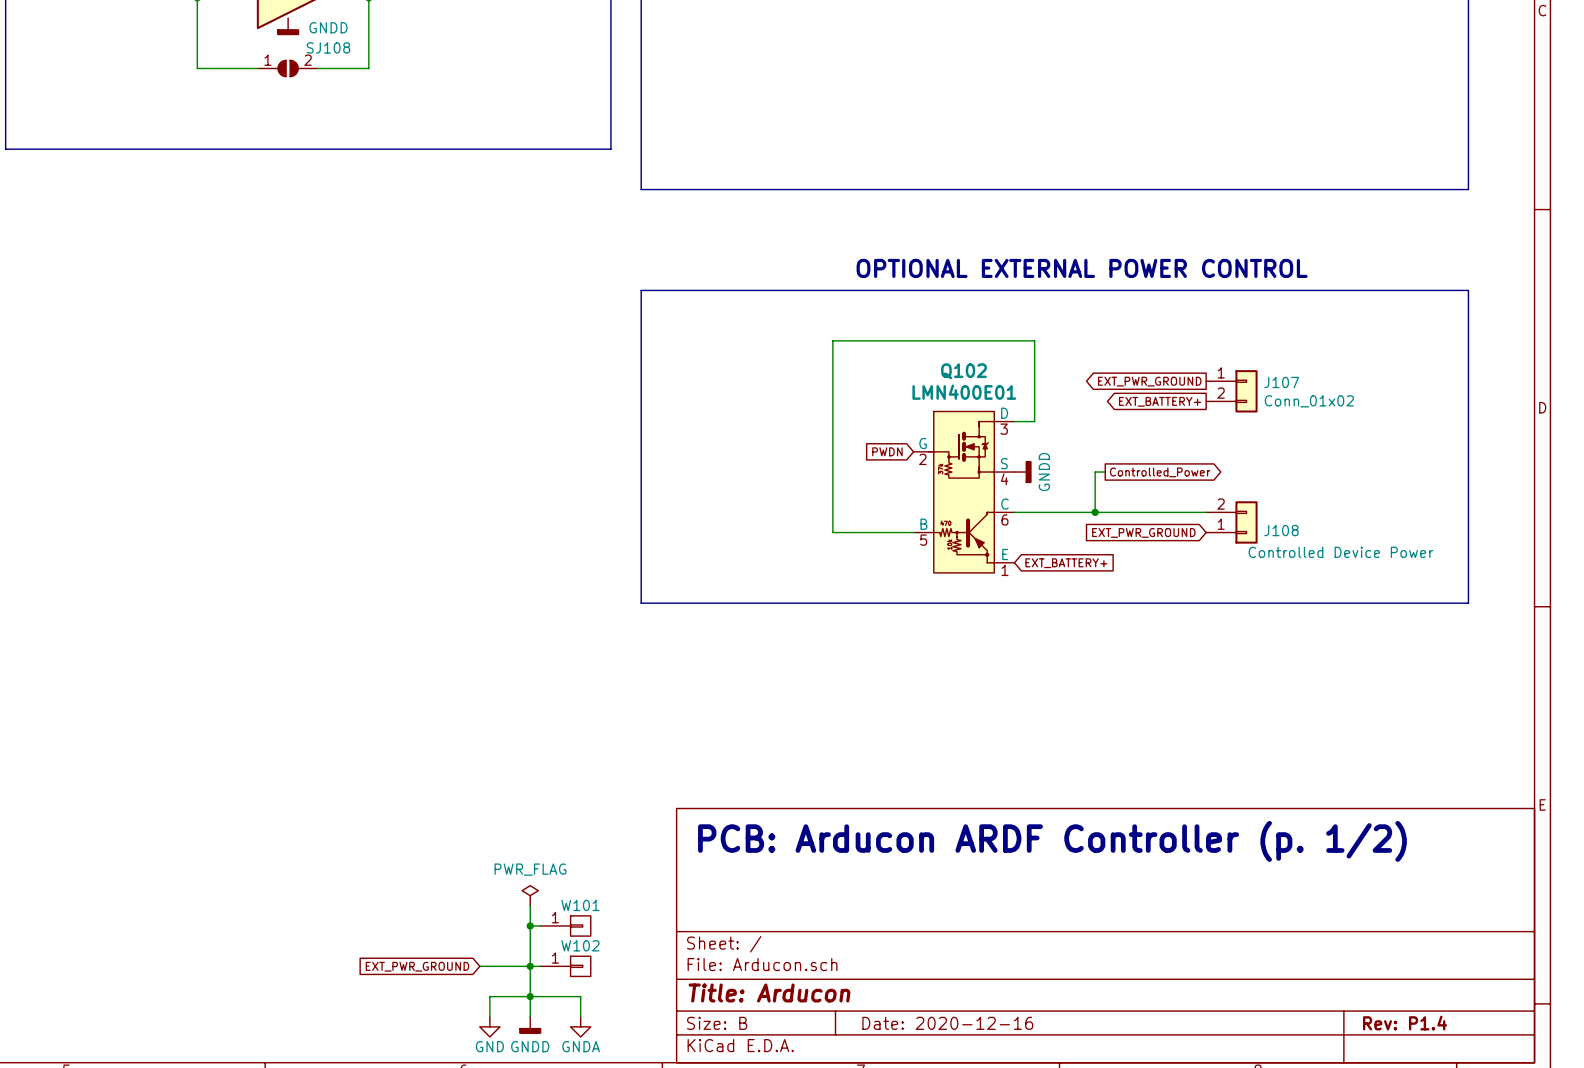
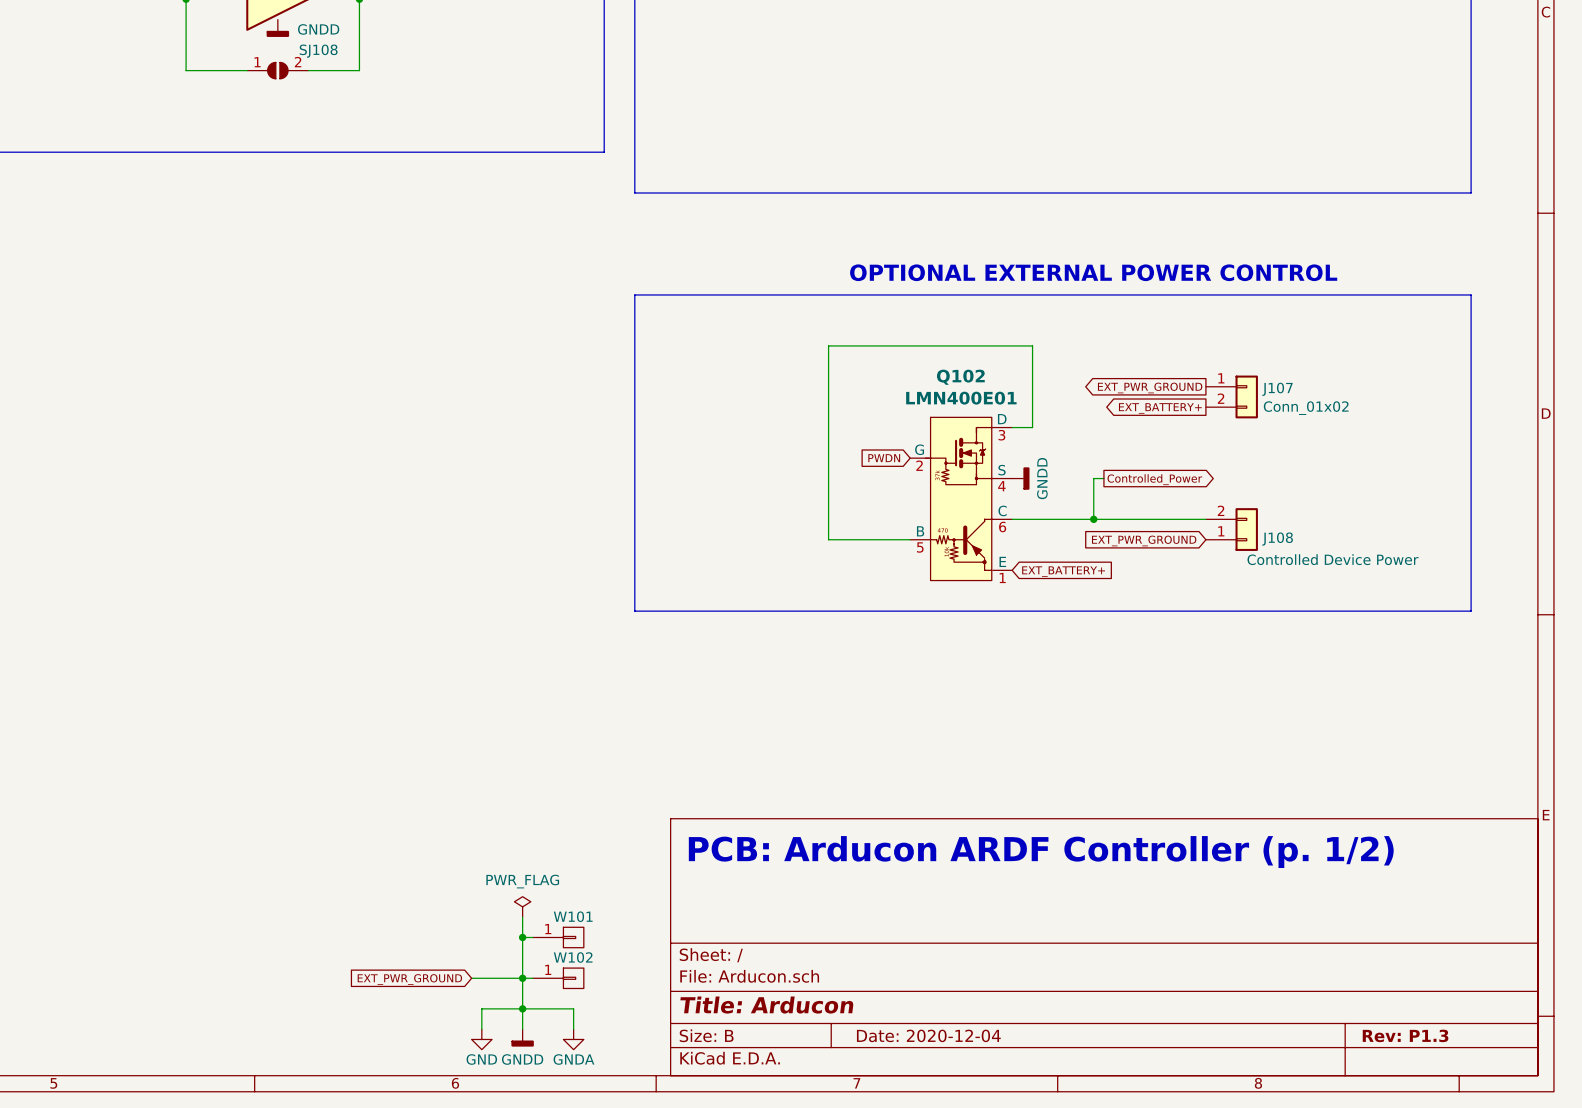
title block: Date: 2020-12-16 (947, 1023) -> Date: 2020-12-04 (928, 1035)
title block: Rev: P1.4 (1405, 1023) -> Rev: P1.3 (1405, 1035)

